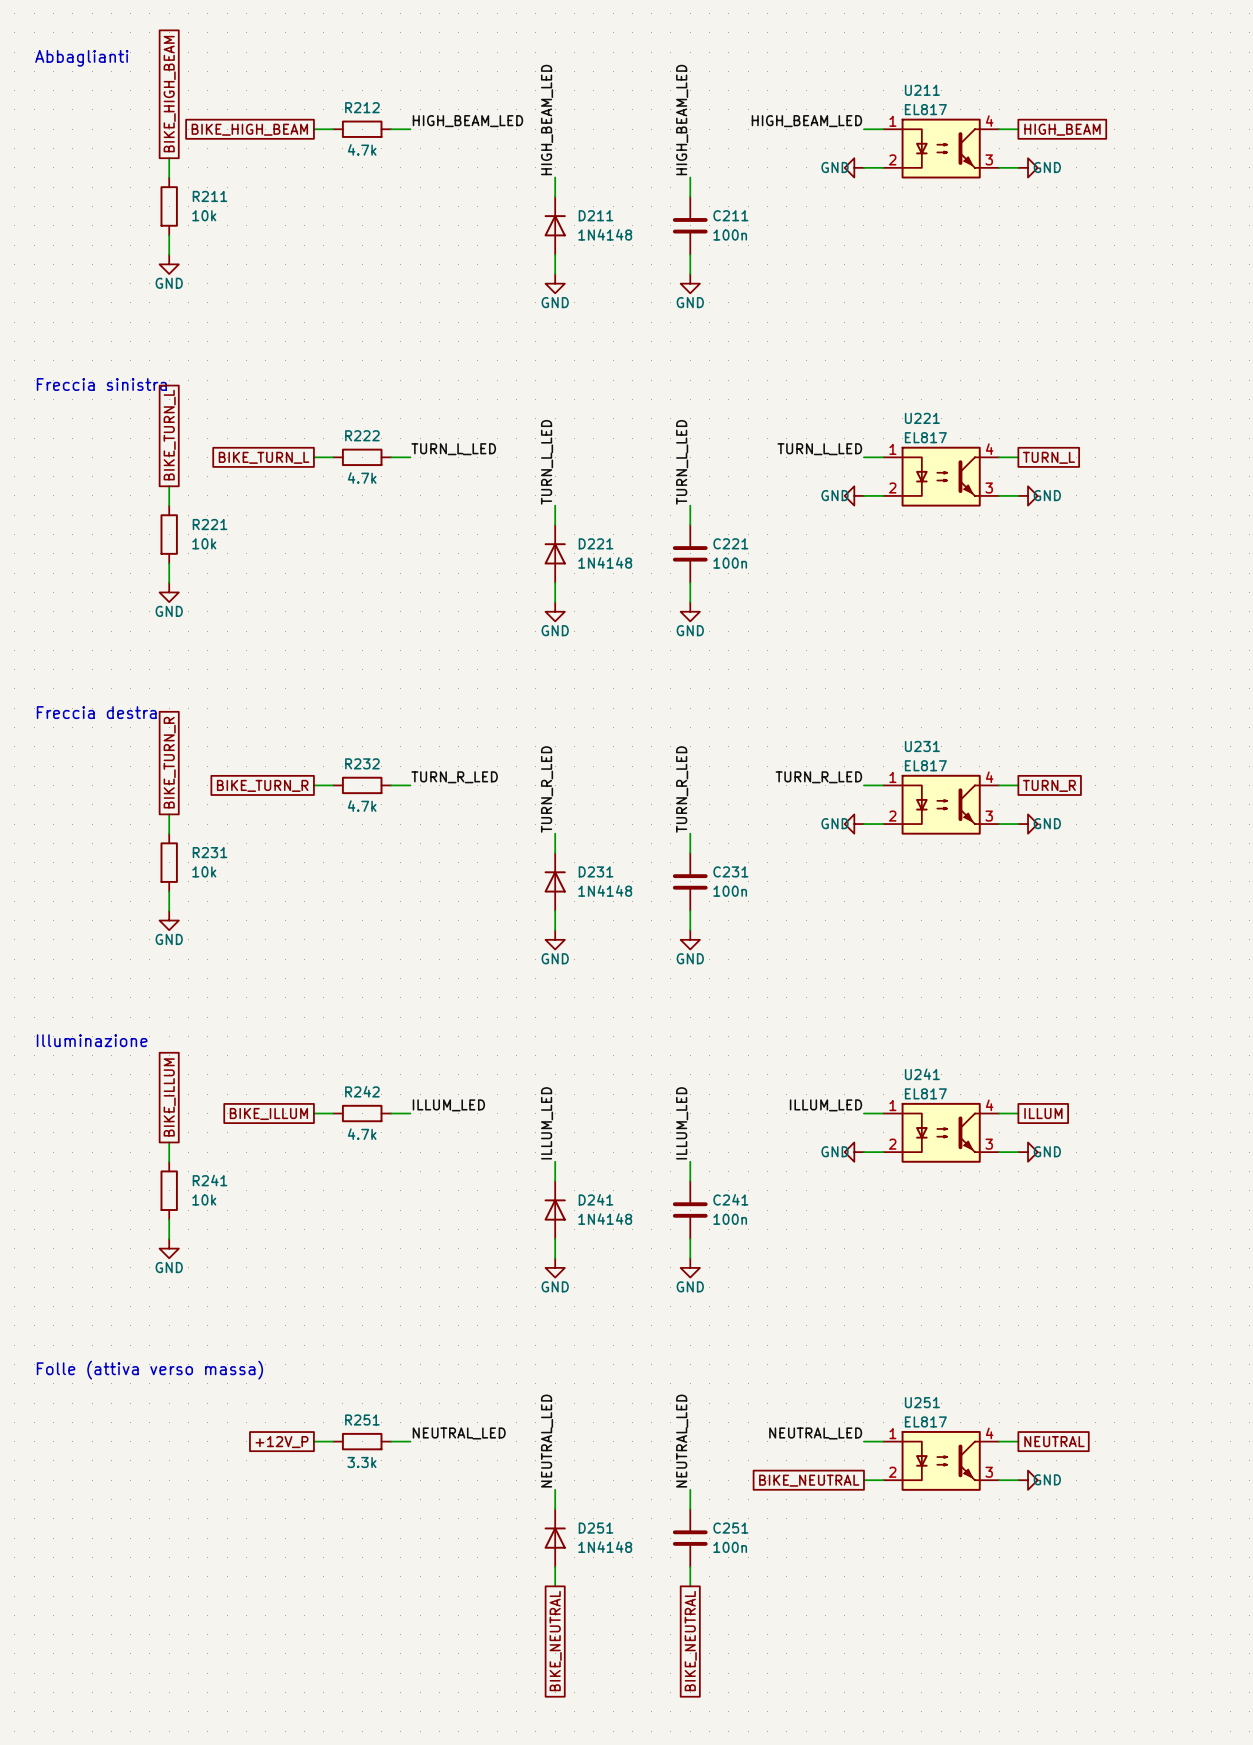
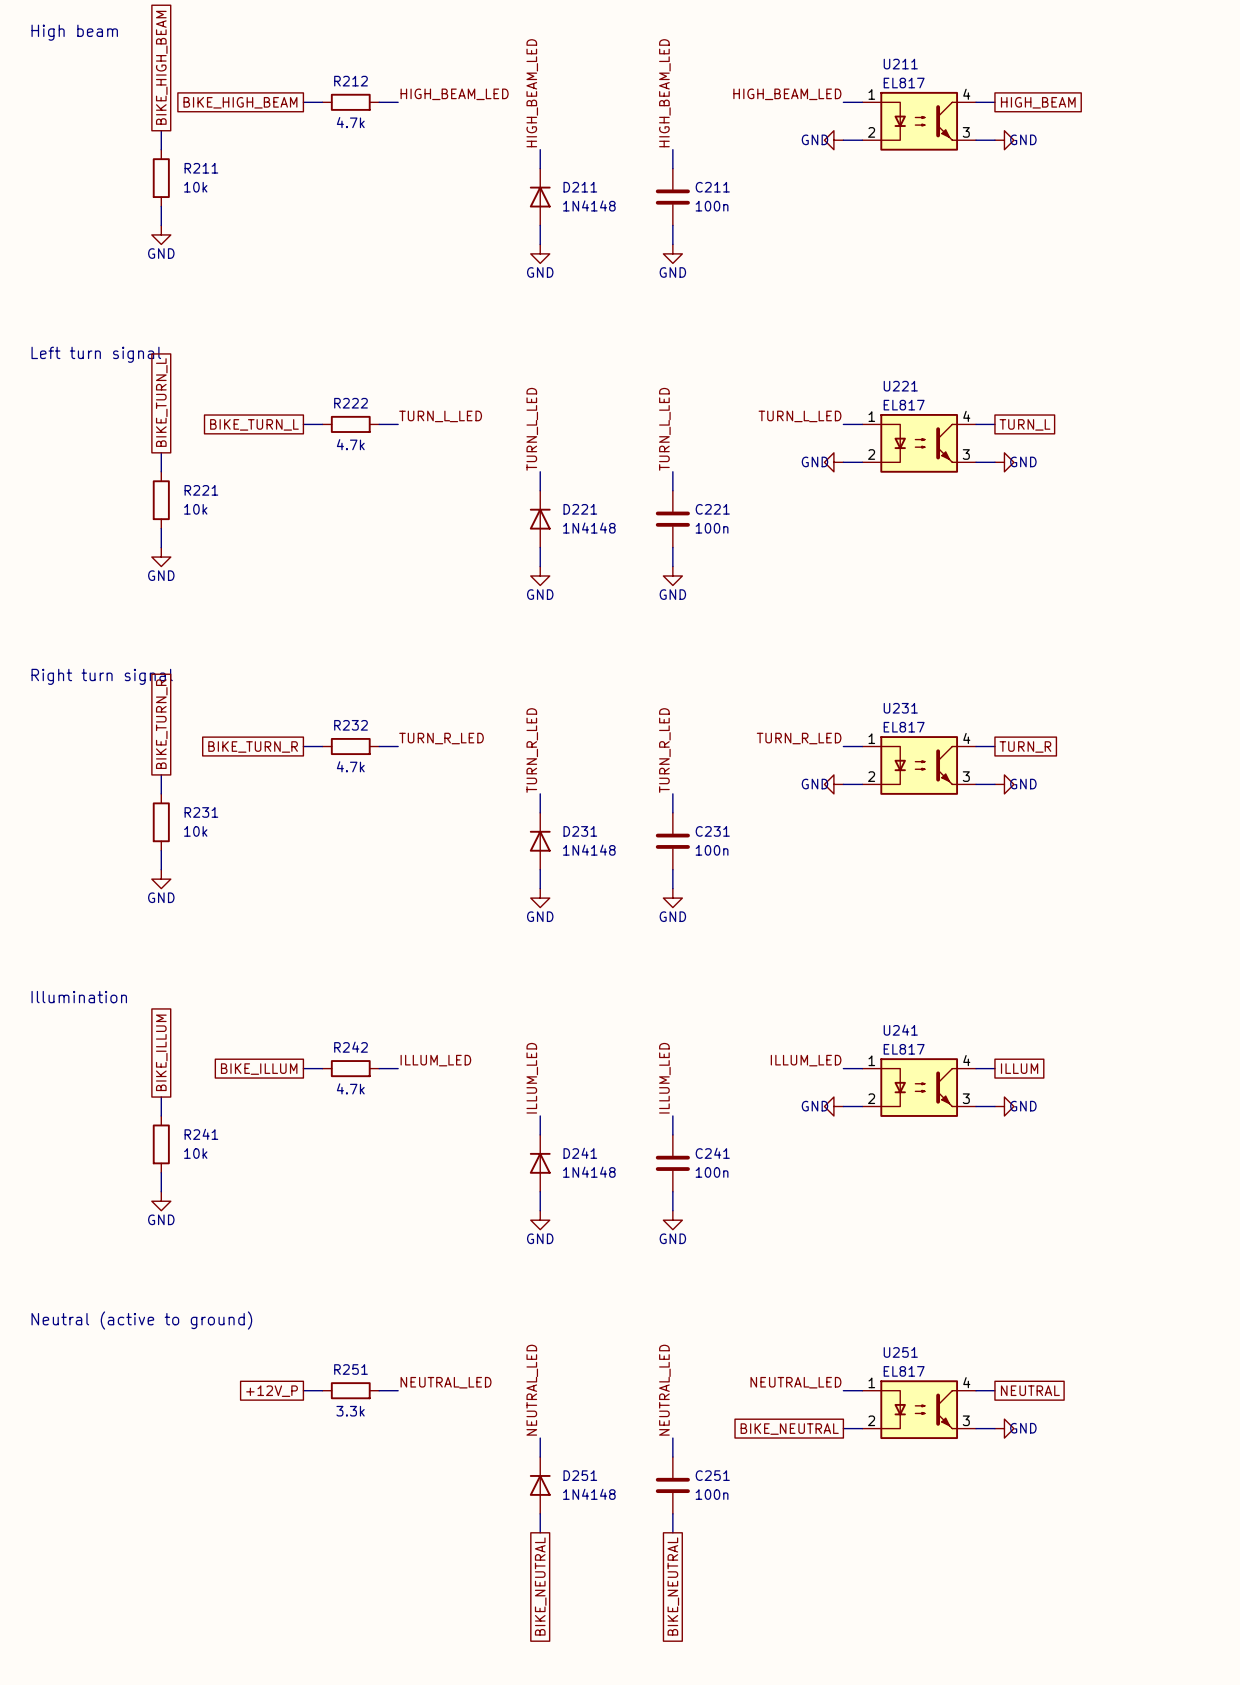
text: Abbaglianti (81, 58) -> High beam (74, 32)
text: Freccia sinistra (101, 384) -> Left turn signal (96, 354)
text: Freccia destra (96, 712) -> Right turn signal (102, 676)
text: Illuminazione (92, 1040) -> Illumination (79, 997)
text: Folle (attiva verso massa) (149, 1370) -> Neutral (active to ground) (141, 1320)

